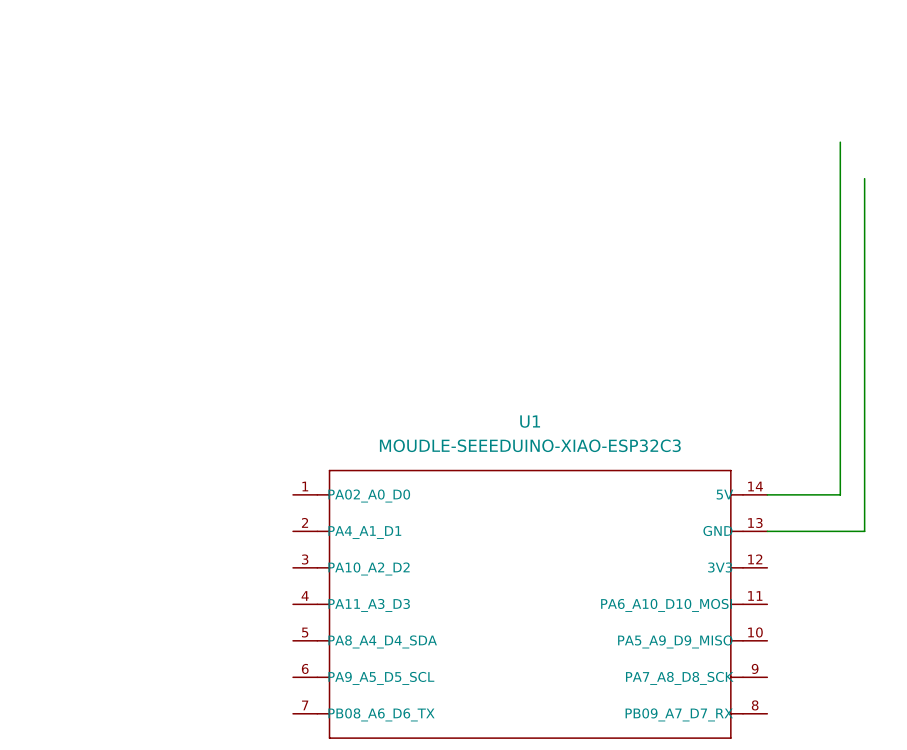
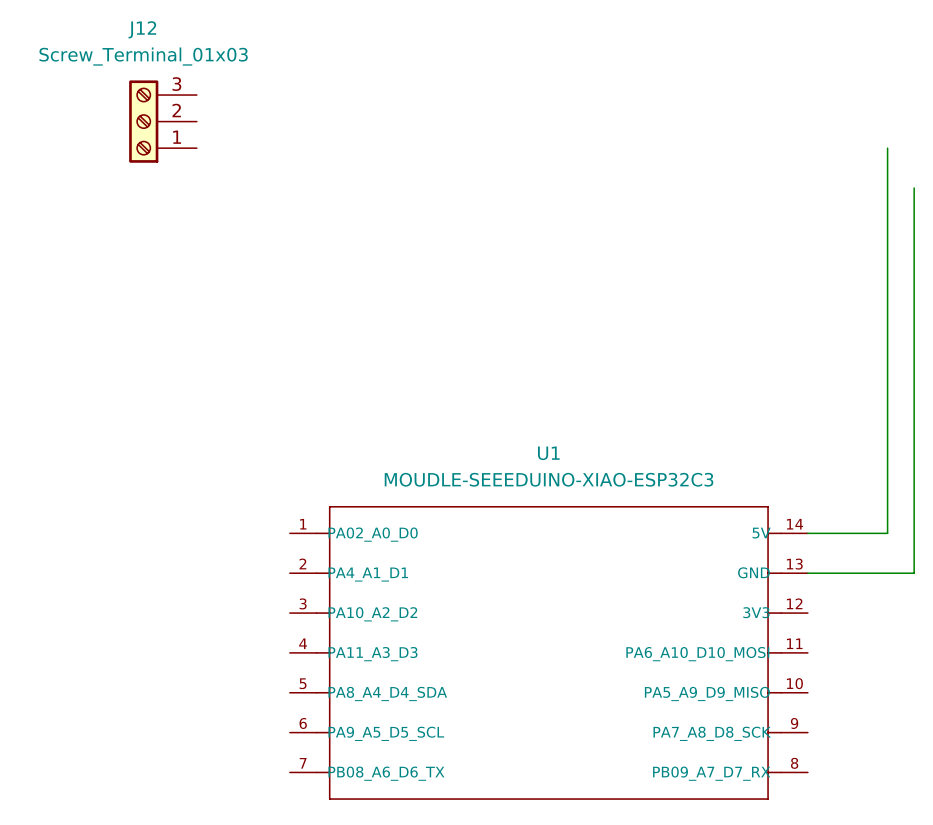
J12: none -> Screw_Terminal_01x03 (163, 121)

